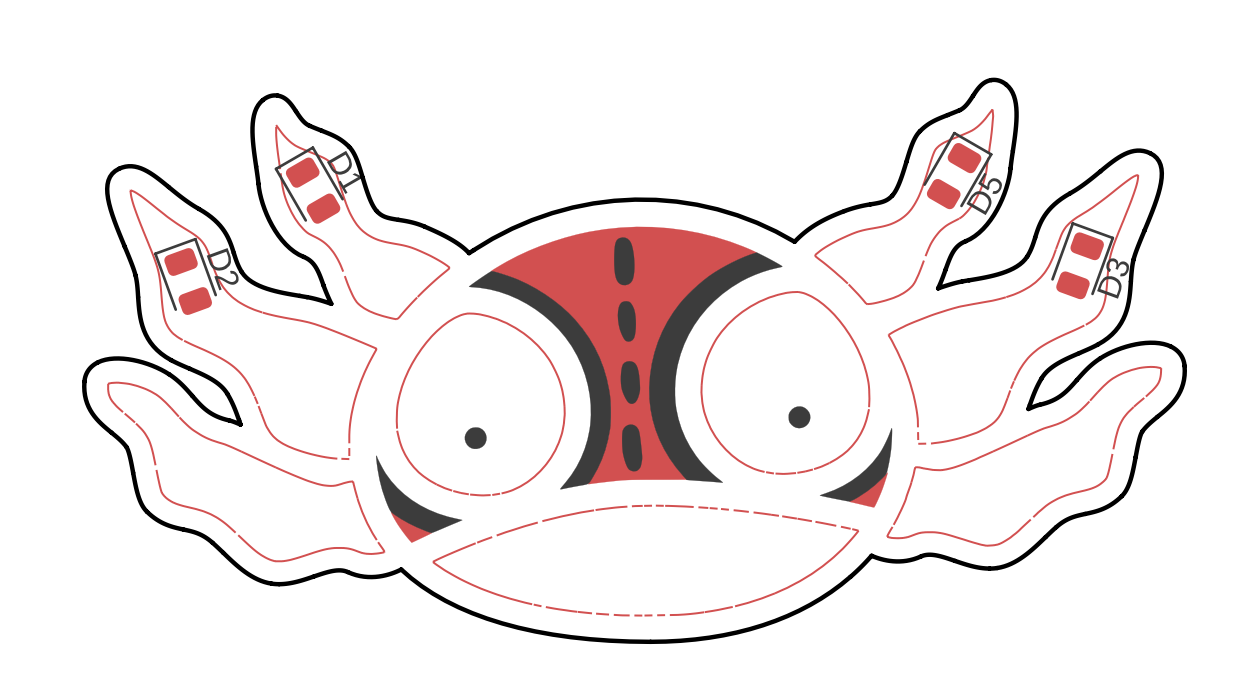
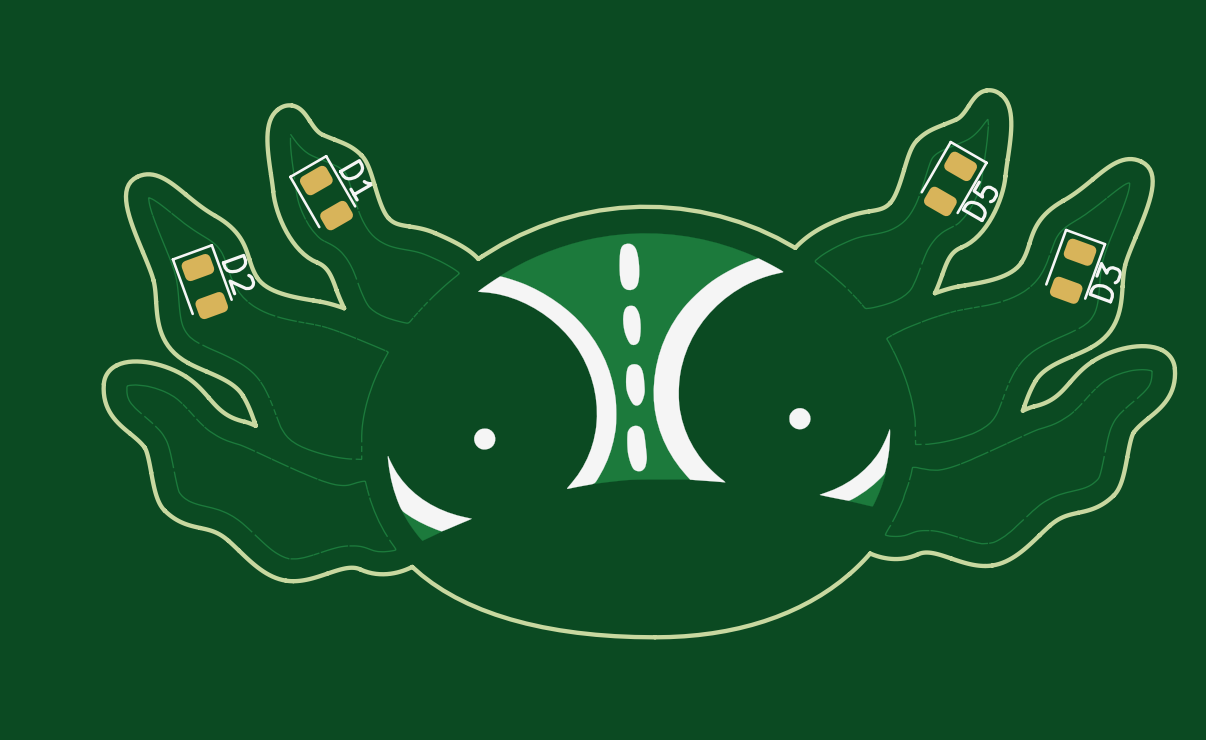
zone outline: (720, 443) (707, 421) (701, 393) (706, 360) (717, 337) (728, 324) (742, 311) (769, 297) (798, 291) (818, 300) (834, 314) (849, 334) (857, 349) (866, 372) (869, 387) (869, 409) (863, 427) (857, 439) (847, 450) (829, 463) (805, 471) (783, 473) (764, 471) (745, 465) (731, 455) (720, 443) -> none
zone outline: (545, 464) (558, 442) (564, 414) (560, 382) (548, 358) (538, 345) (523, 333) (496, 319) (468, 313) (448, 321) (431, 336) (416, 356) (408, 370) (399, 394) (397, 408) (397, 430) (402, 448) (409, 461) (418, 471) (436, 484) (461, 493) (482, 495) (501, 493) (520, 486) (534, 476) (545, 465) -> none
zone outline: (433, 561) (481, 541) (524, 526) (578, 512) (619, 507) (655, 505) (721, 508) (782, 516) (858, 530) (842, 549) (823, 565) (787, 587) (761, 598) (732, 606) (684, 614) (621, 615) (541, 606) (481, 588) (454, 576) (433, 562) -> none

